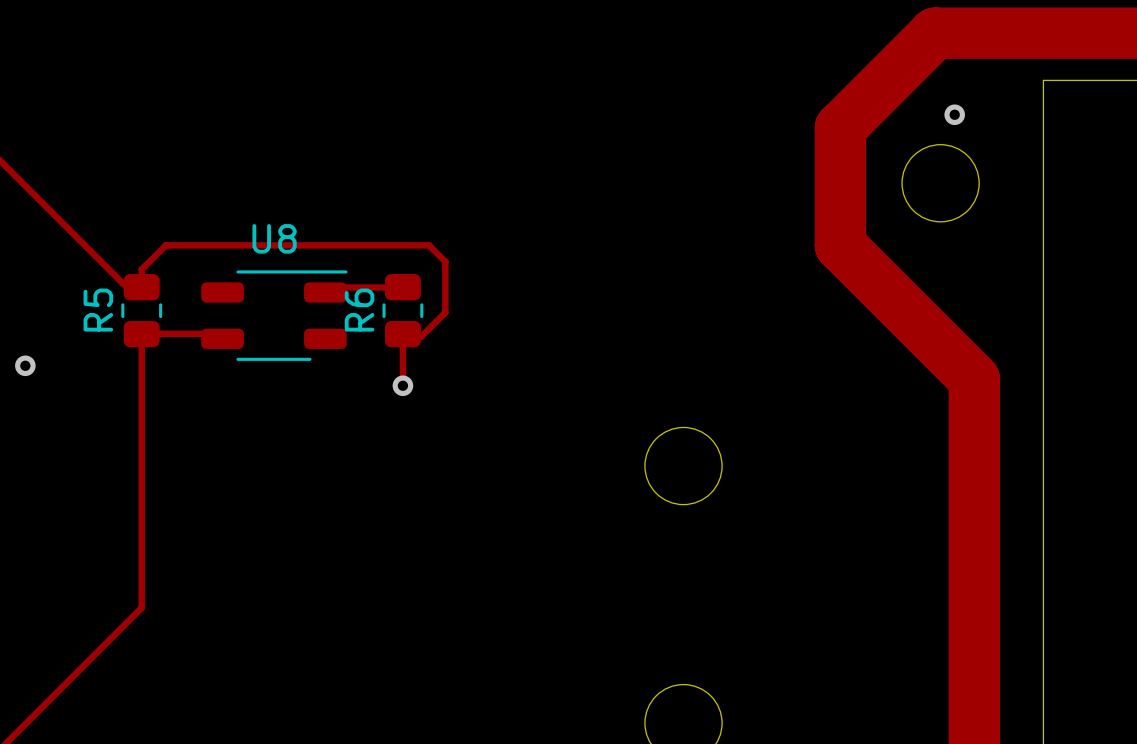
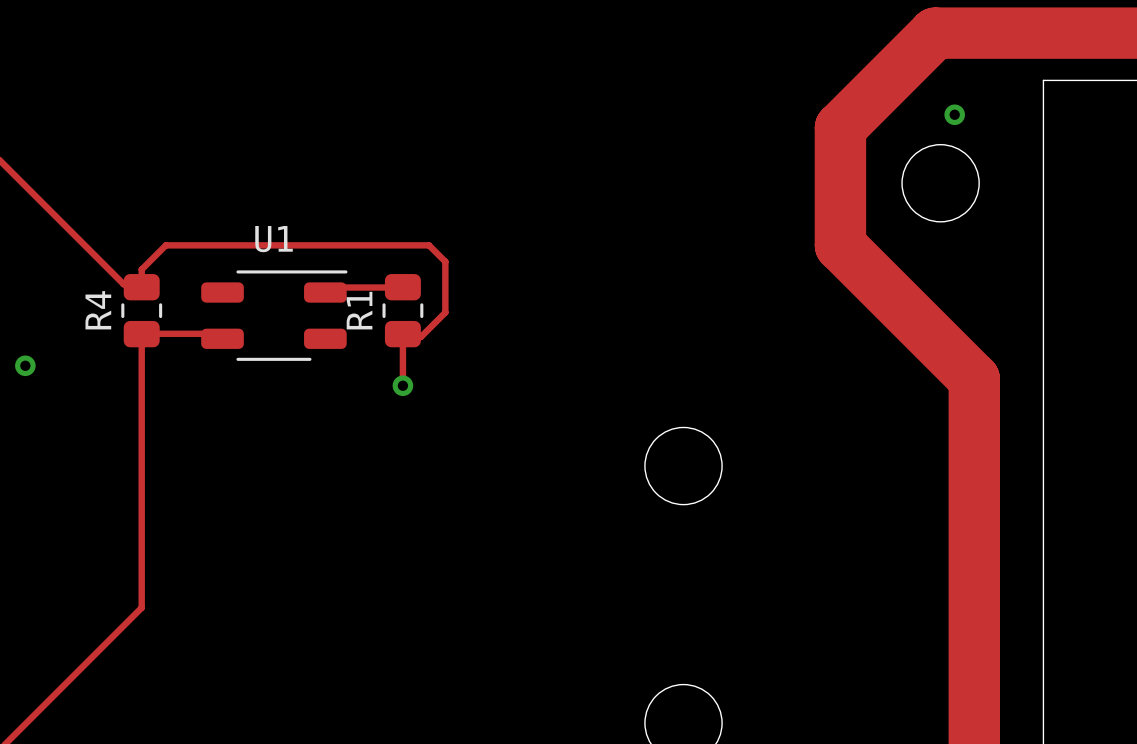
U8 name: U8 (274, 238) -> U1 (274, 239)
R5 name: R5 (98, 310) -> R4 (98, 310)
R6 name: R6 (359, 310) -> R1 (359, 310)

